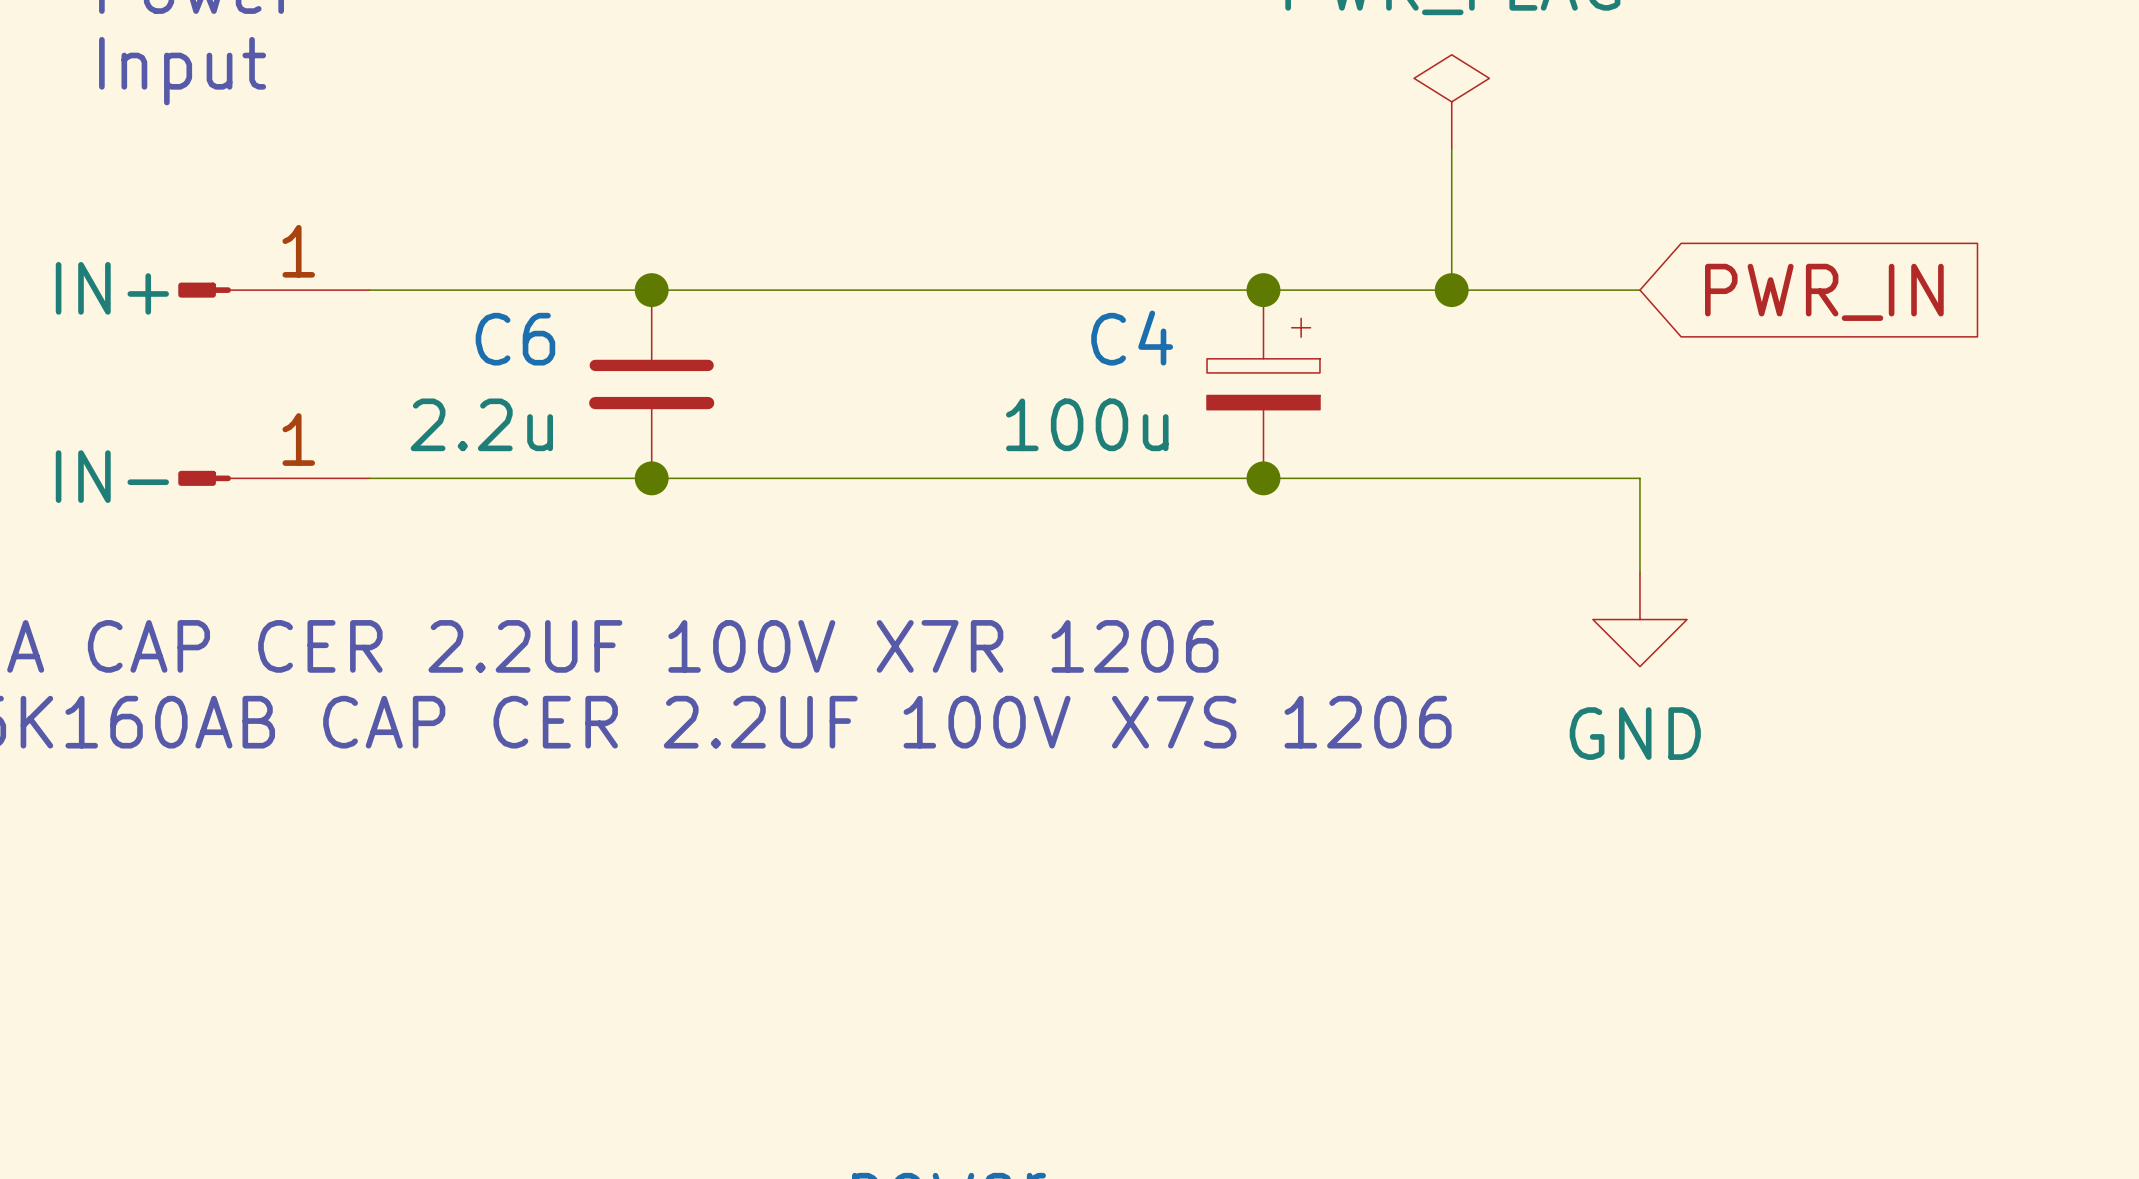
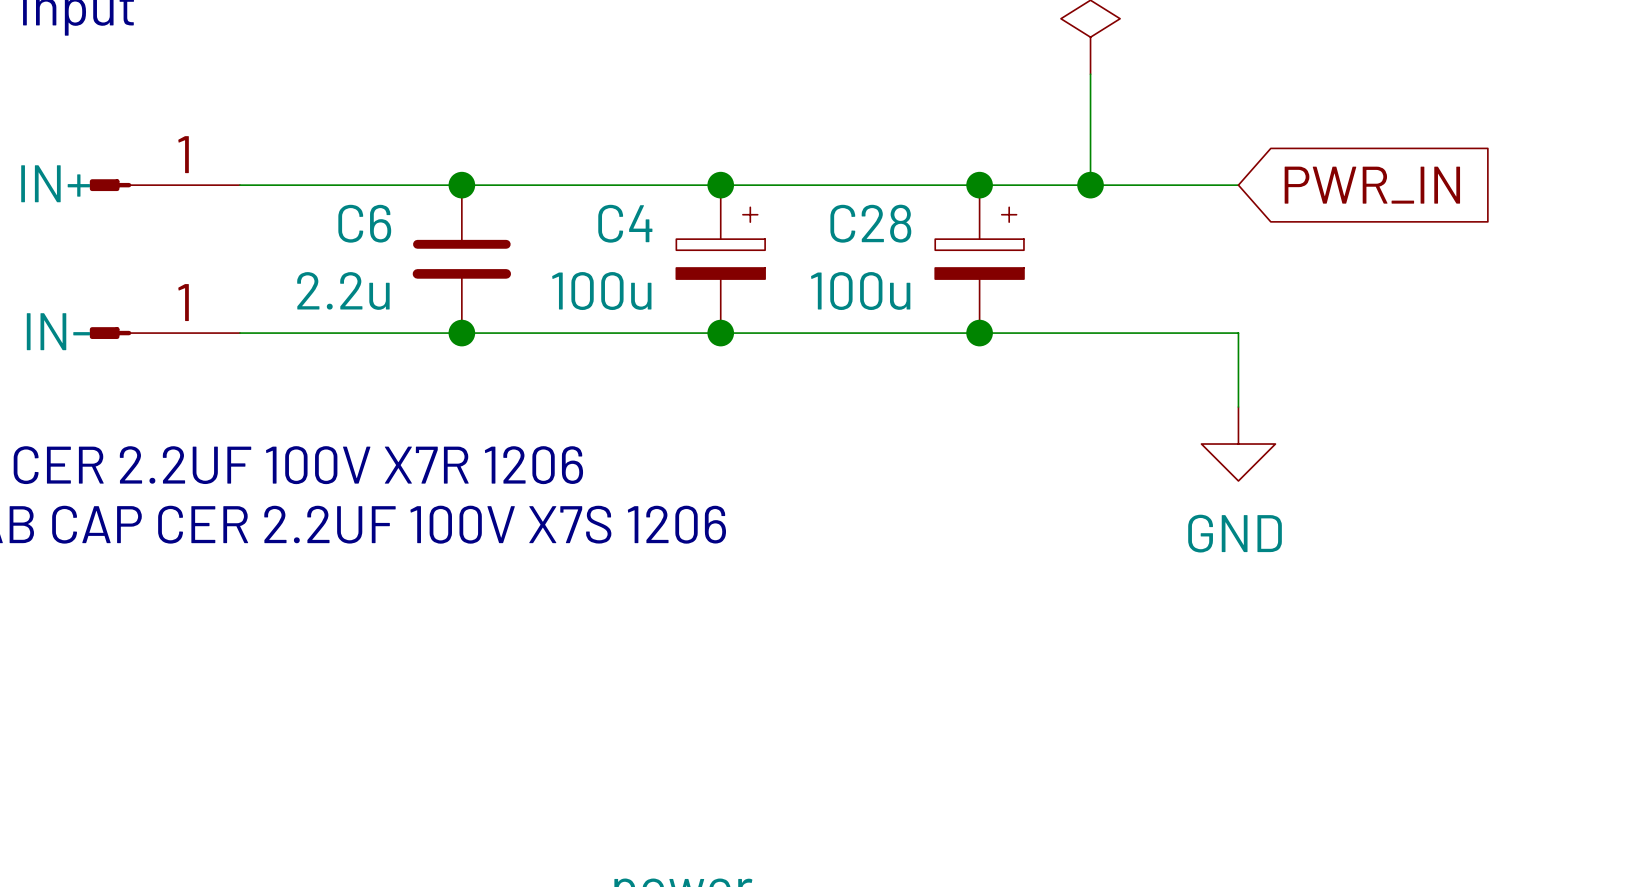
junction: none -> (720, 185)
junction position: (1263, 290) -> (979, 185)
C4 position: (1263, 384) -> (720, 259)
C28: none -> 100u (979, 259)
junction: none -> (720, 333)
junction position: (1263, 478) -> (979, 333)

